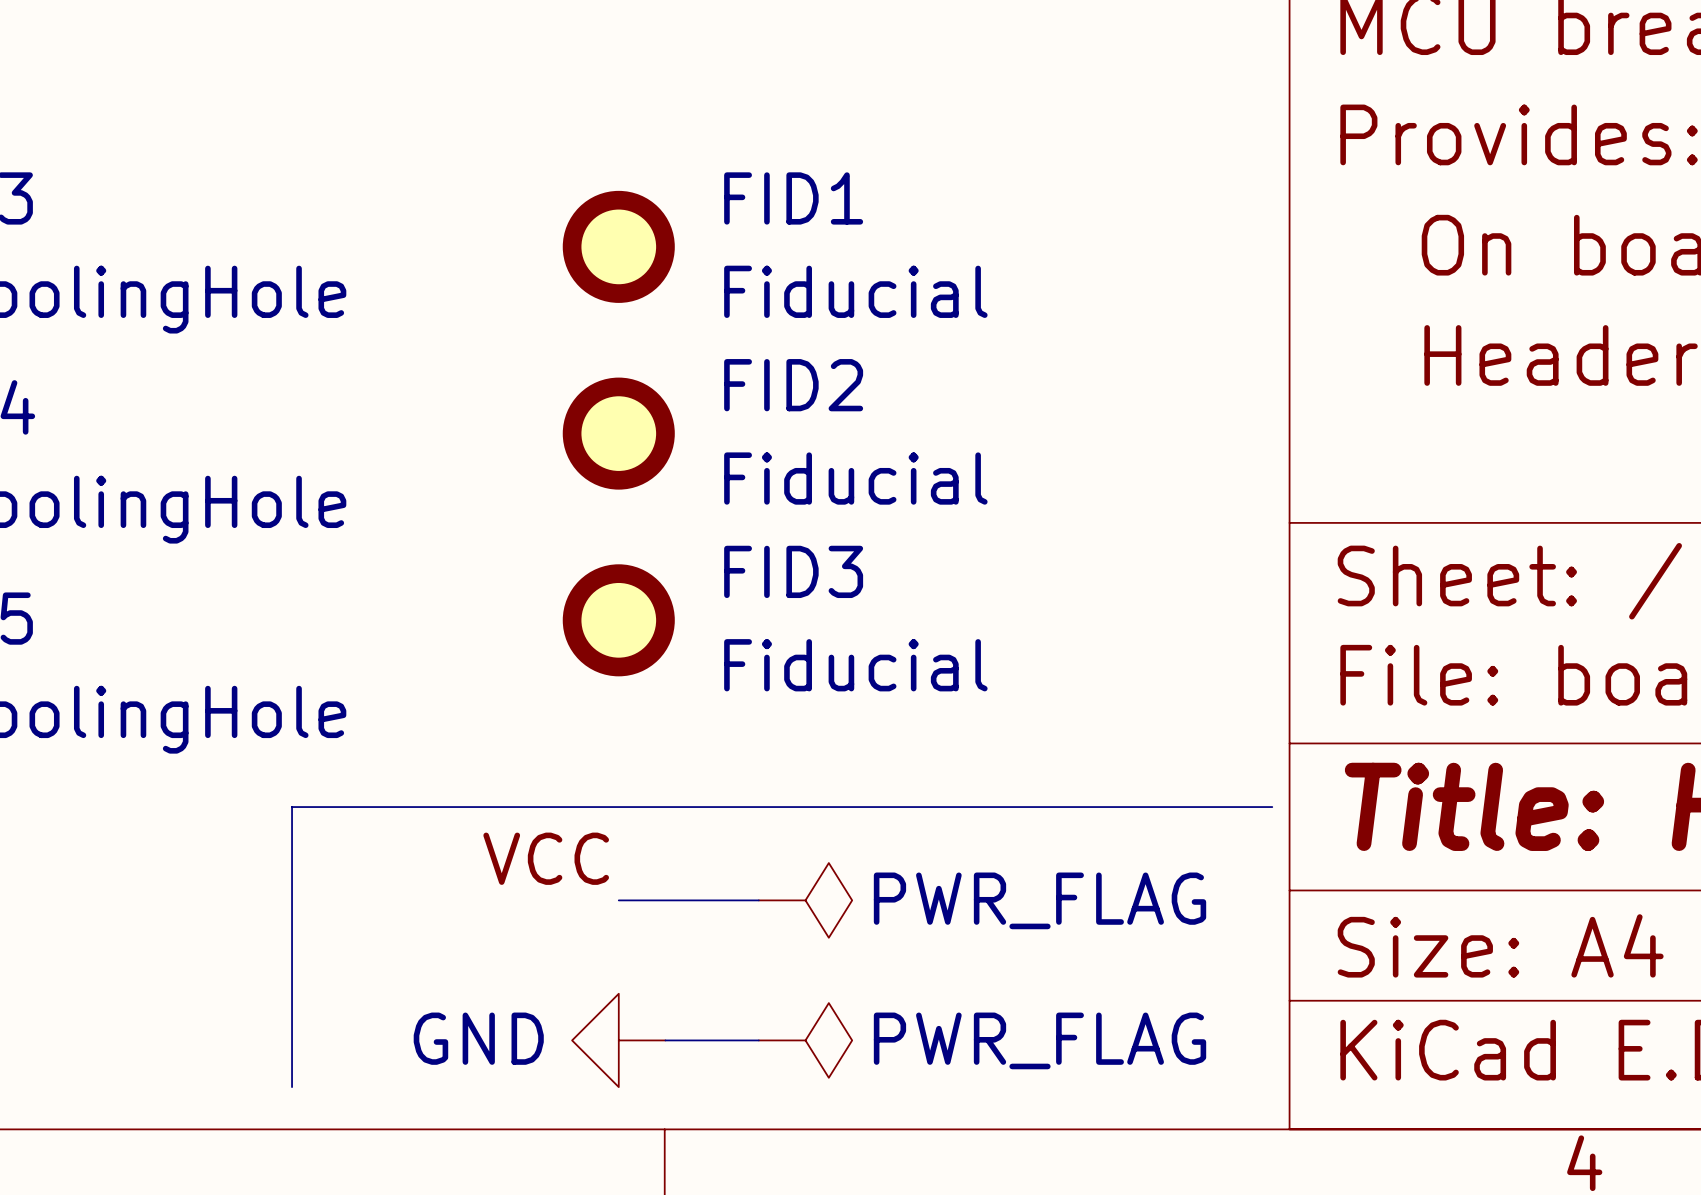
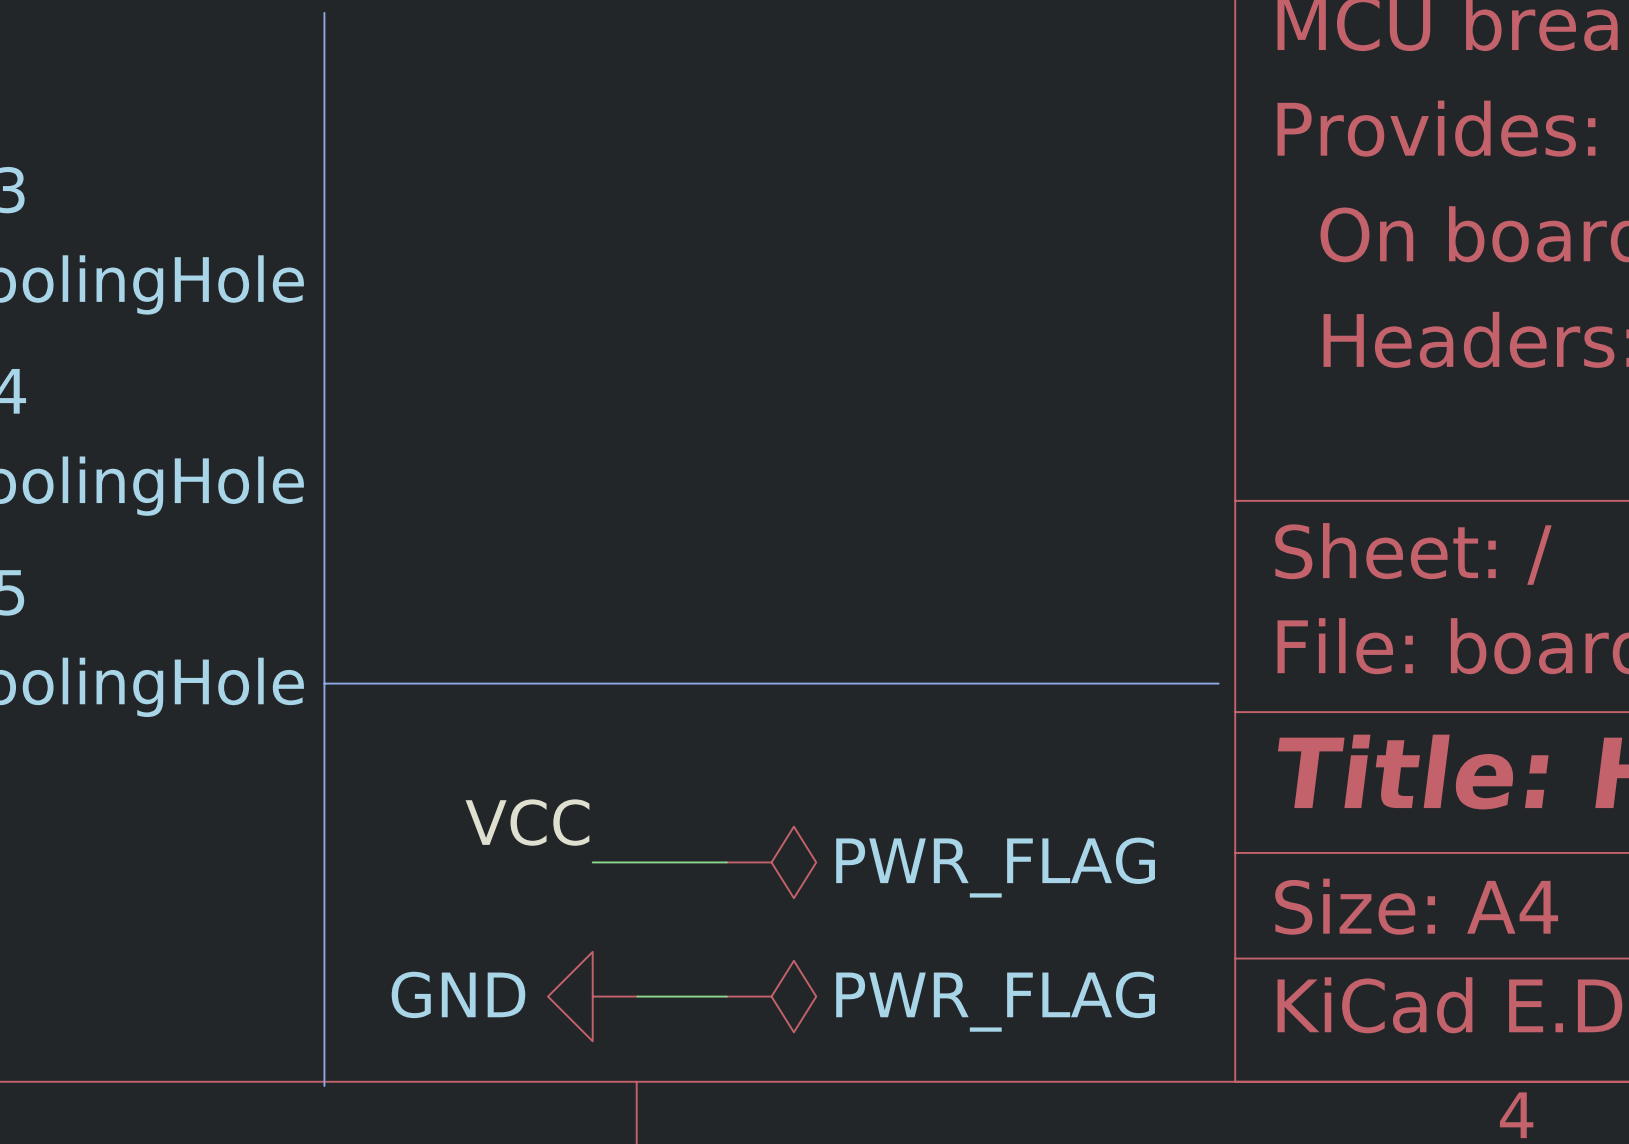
line: none -> (324, 12) (324, 1086)
FID1: Fiducial (618, 246) -> none
FID2: Fiducial (618, 433) -> none
FID3: Fiducial (618, 620) -> none
line: none -> (324, 683) (1218, 683)
line: (1272, 807) (292, 807) (292, 1087) -> none

